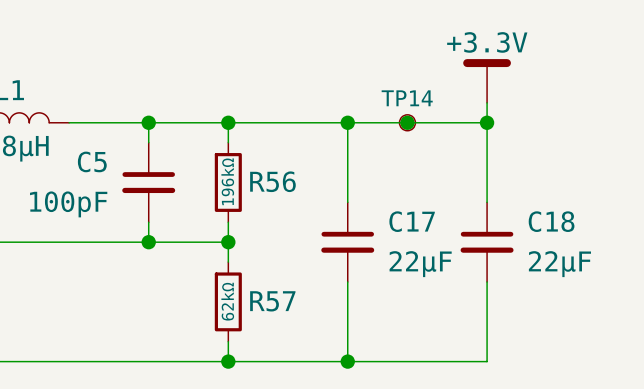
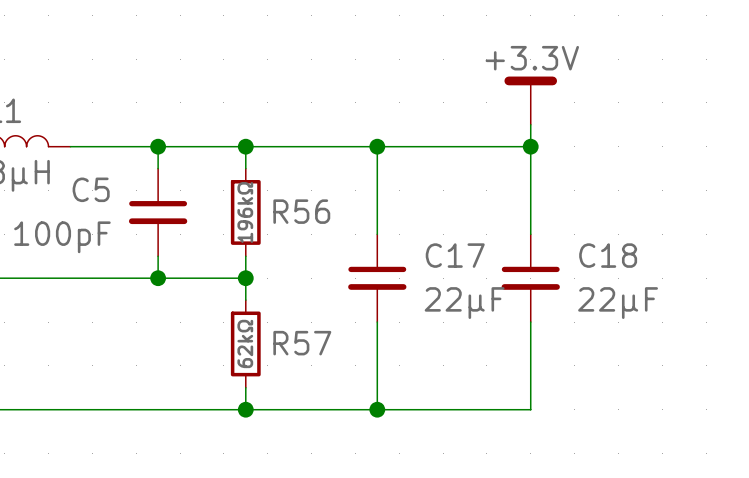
junction: (407, 122) -> none
TP14: (407, 122) -> none

